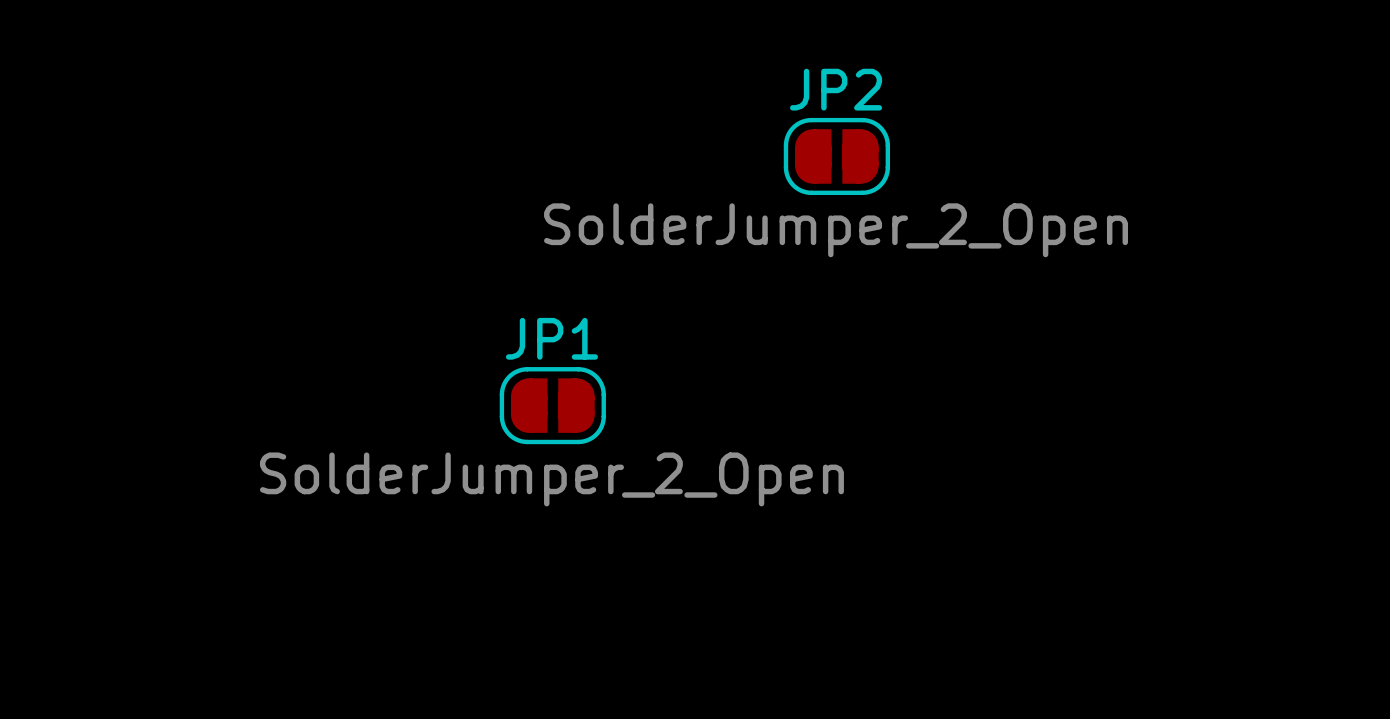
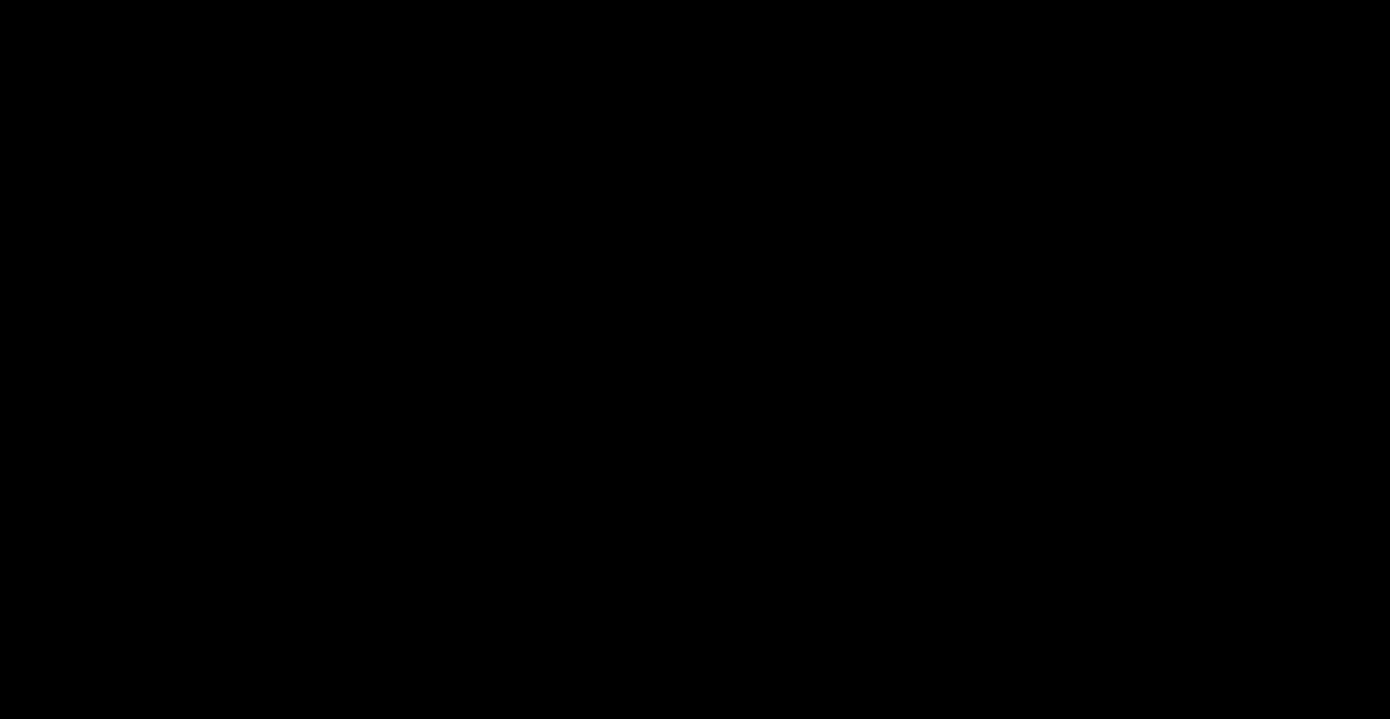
JP2: SolderJumper_2_Open (836, 156) -> none
JP1: SolderJumper_2_Open (552, 405) -> none

